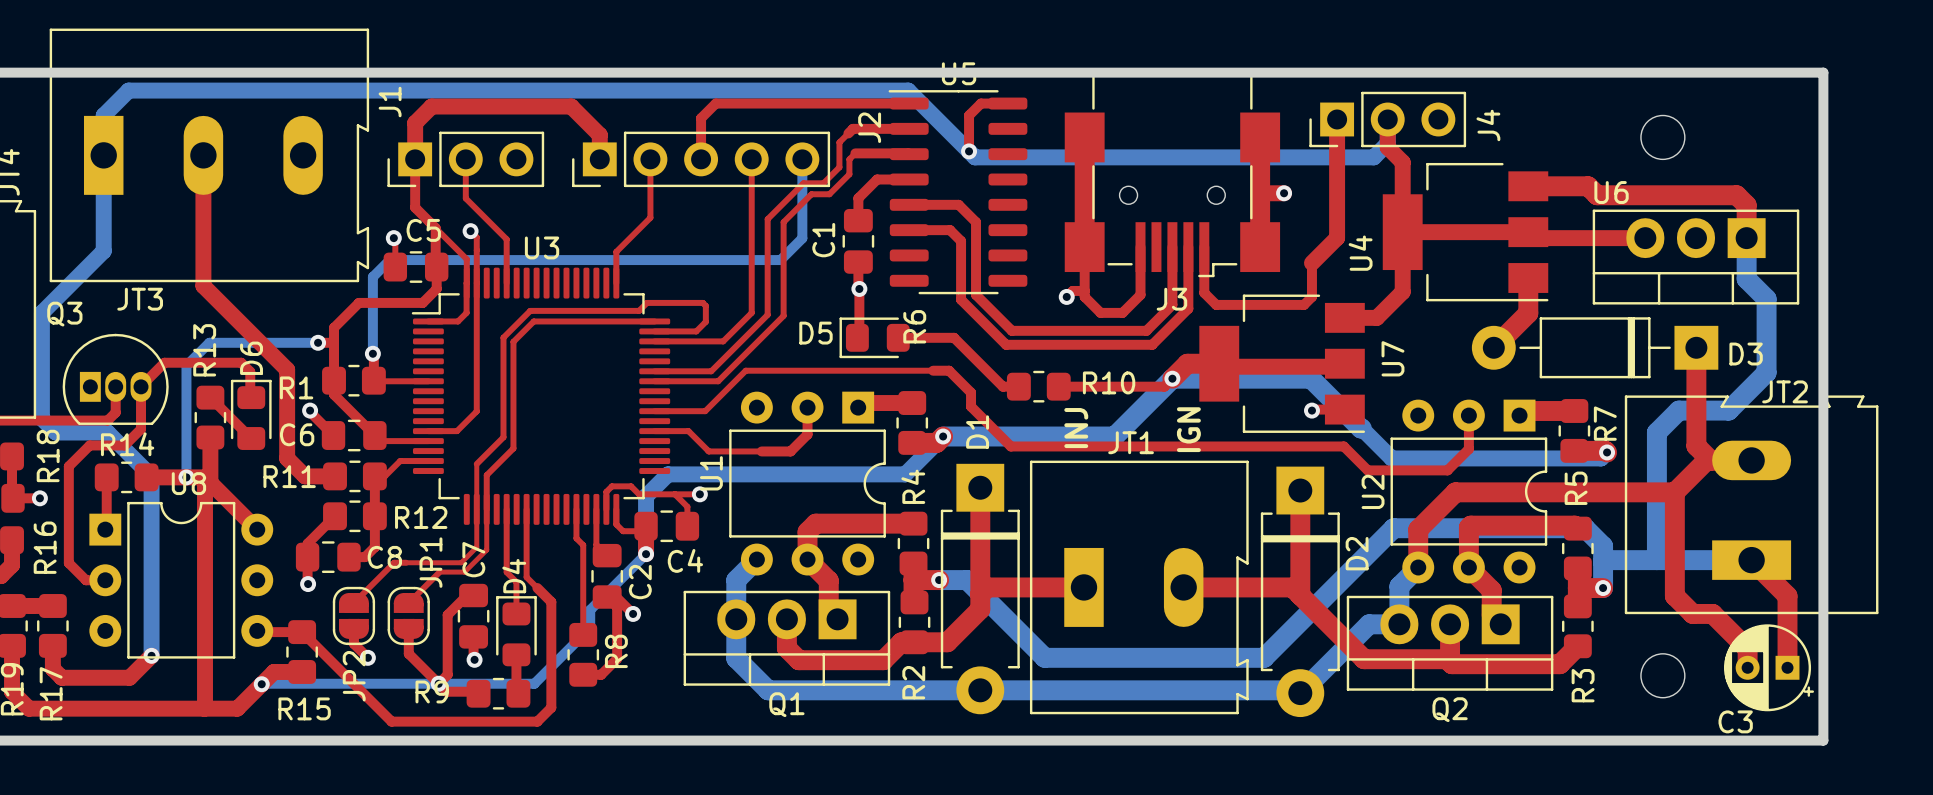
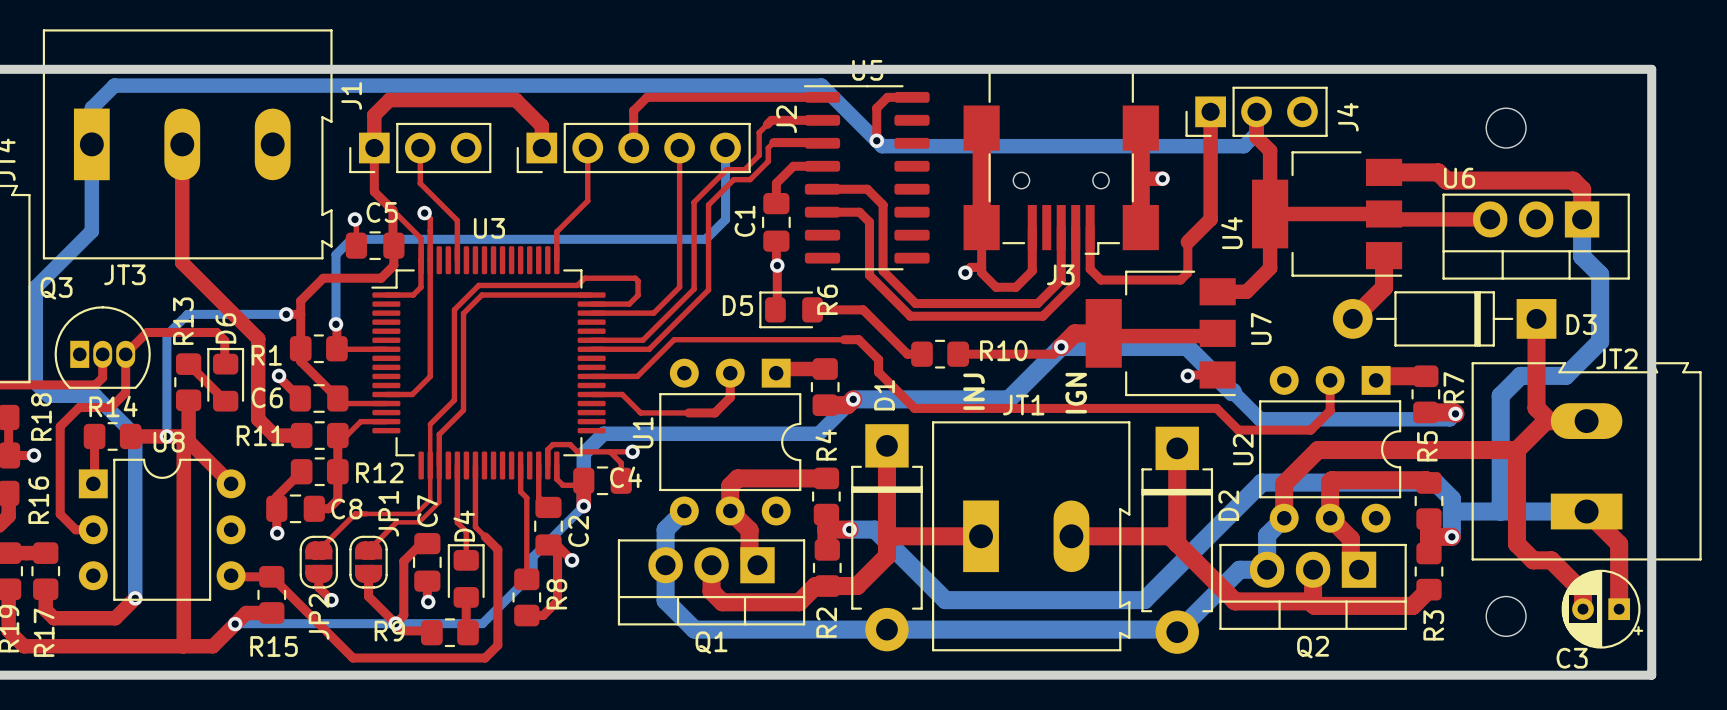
C4 name position: C4 (685, 560) -> C4 (626, 477)

